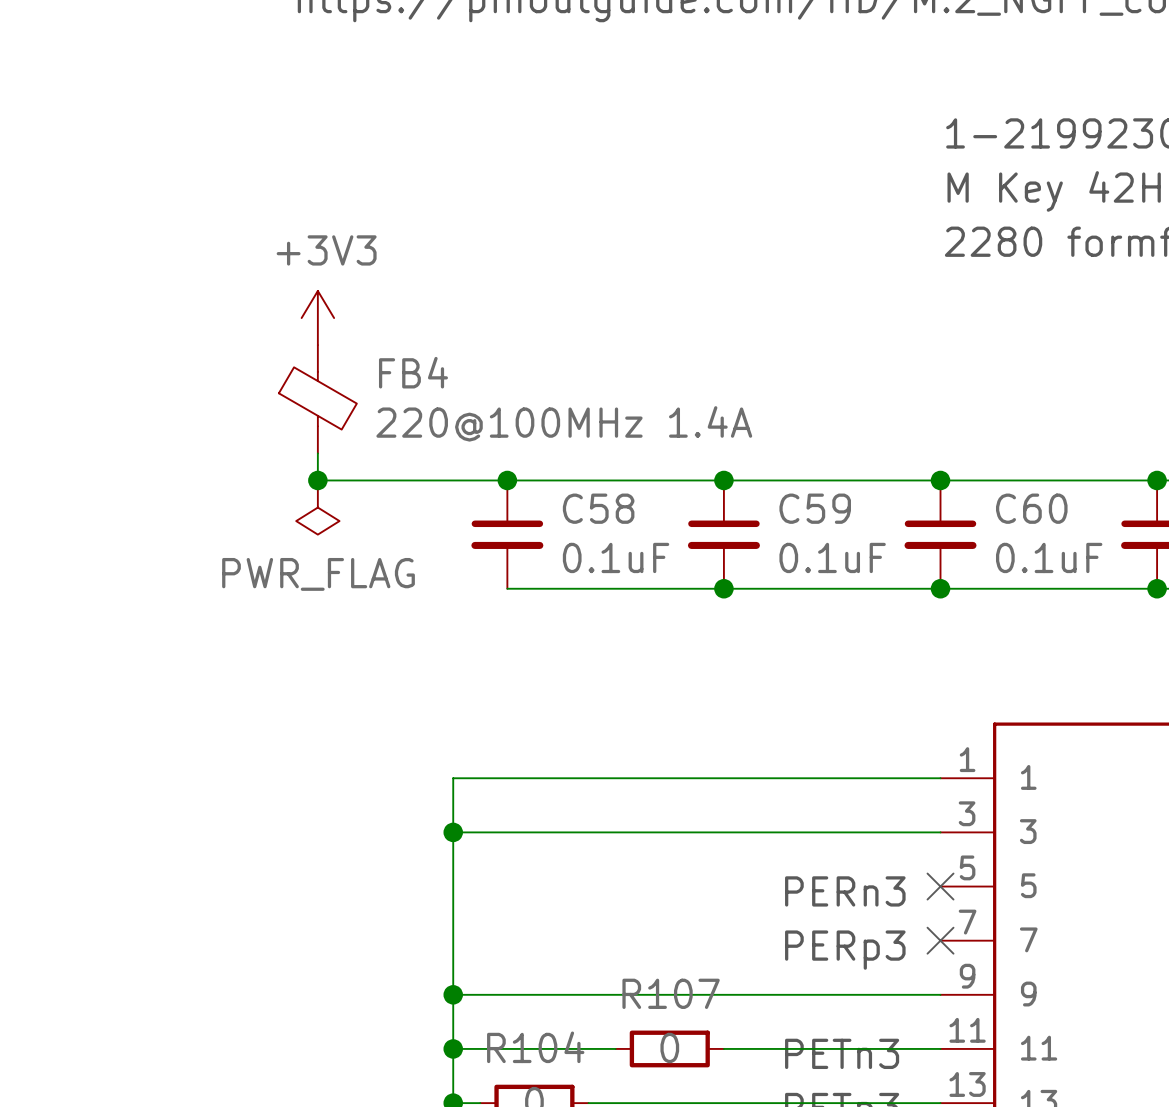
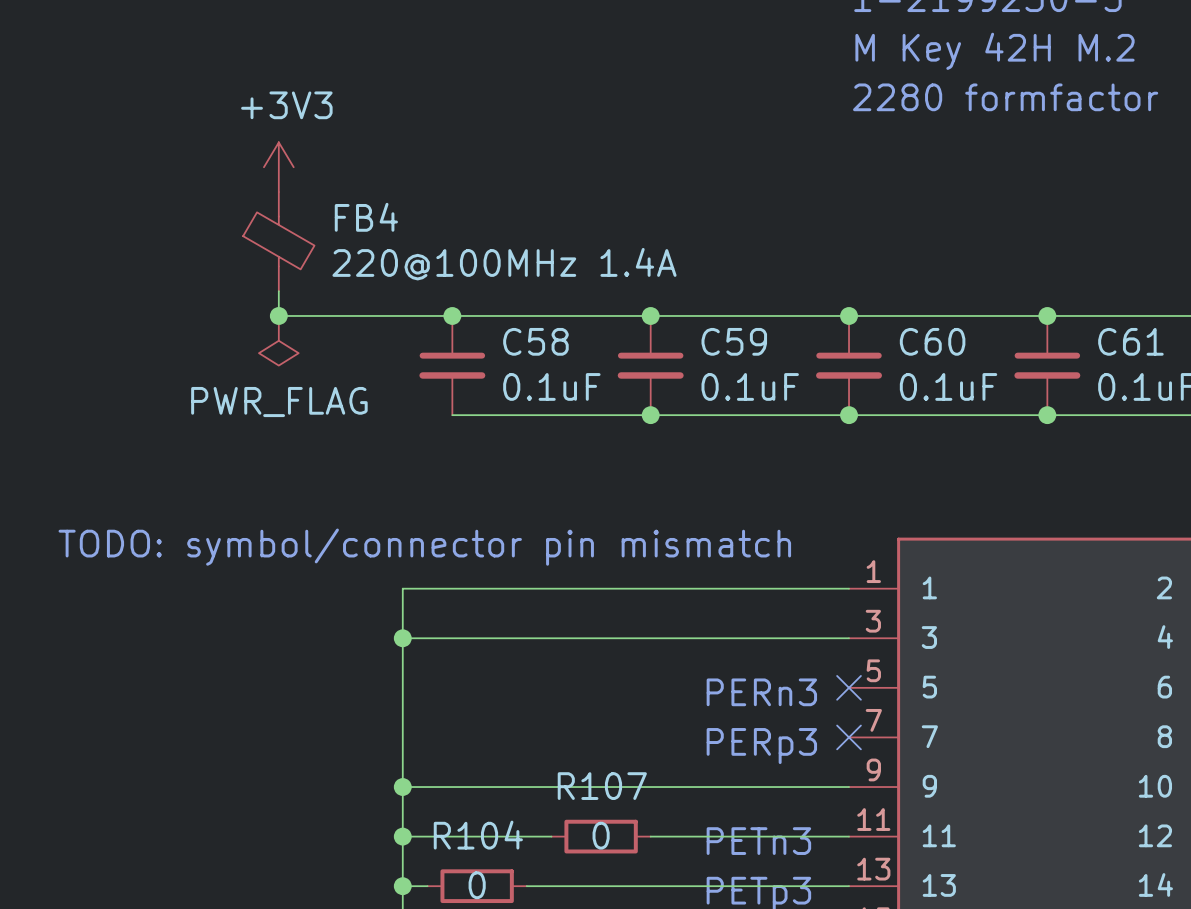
text: none -> TODO: symbol/connector pin mismatch (424, 547)

